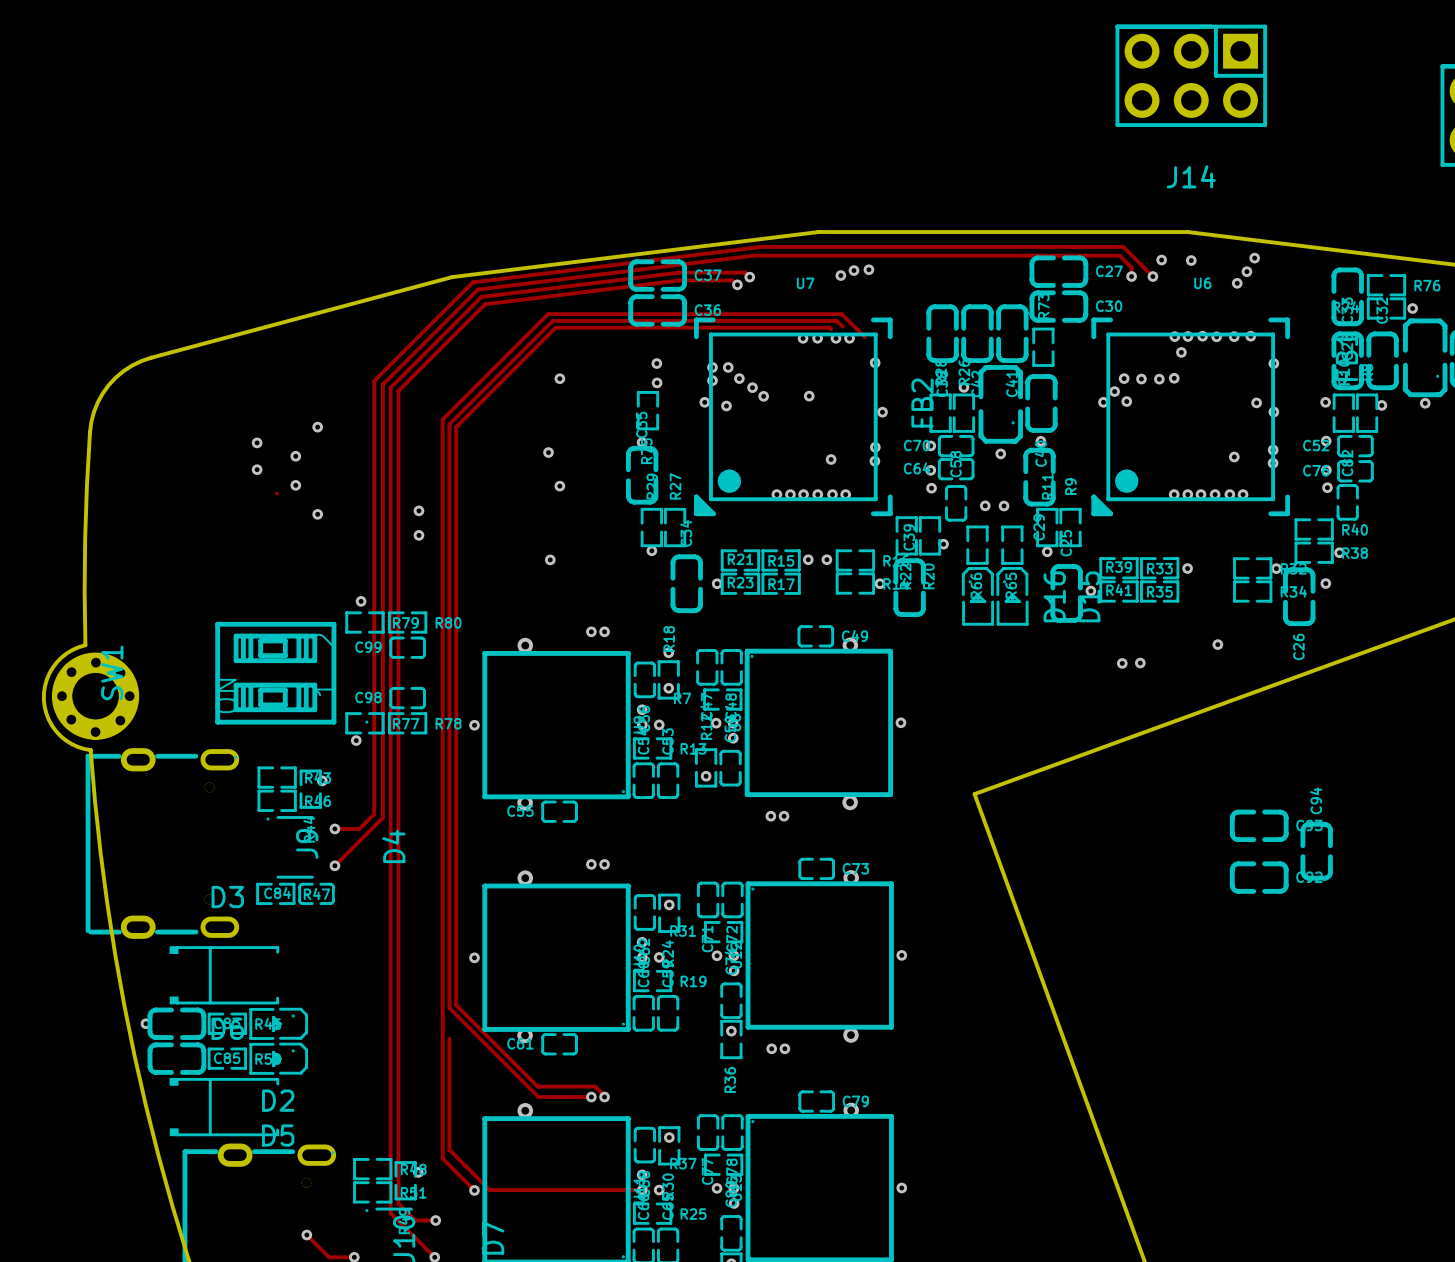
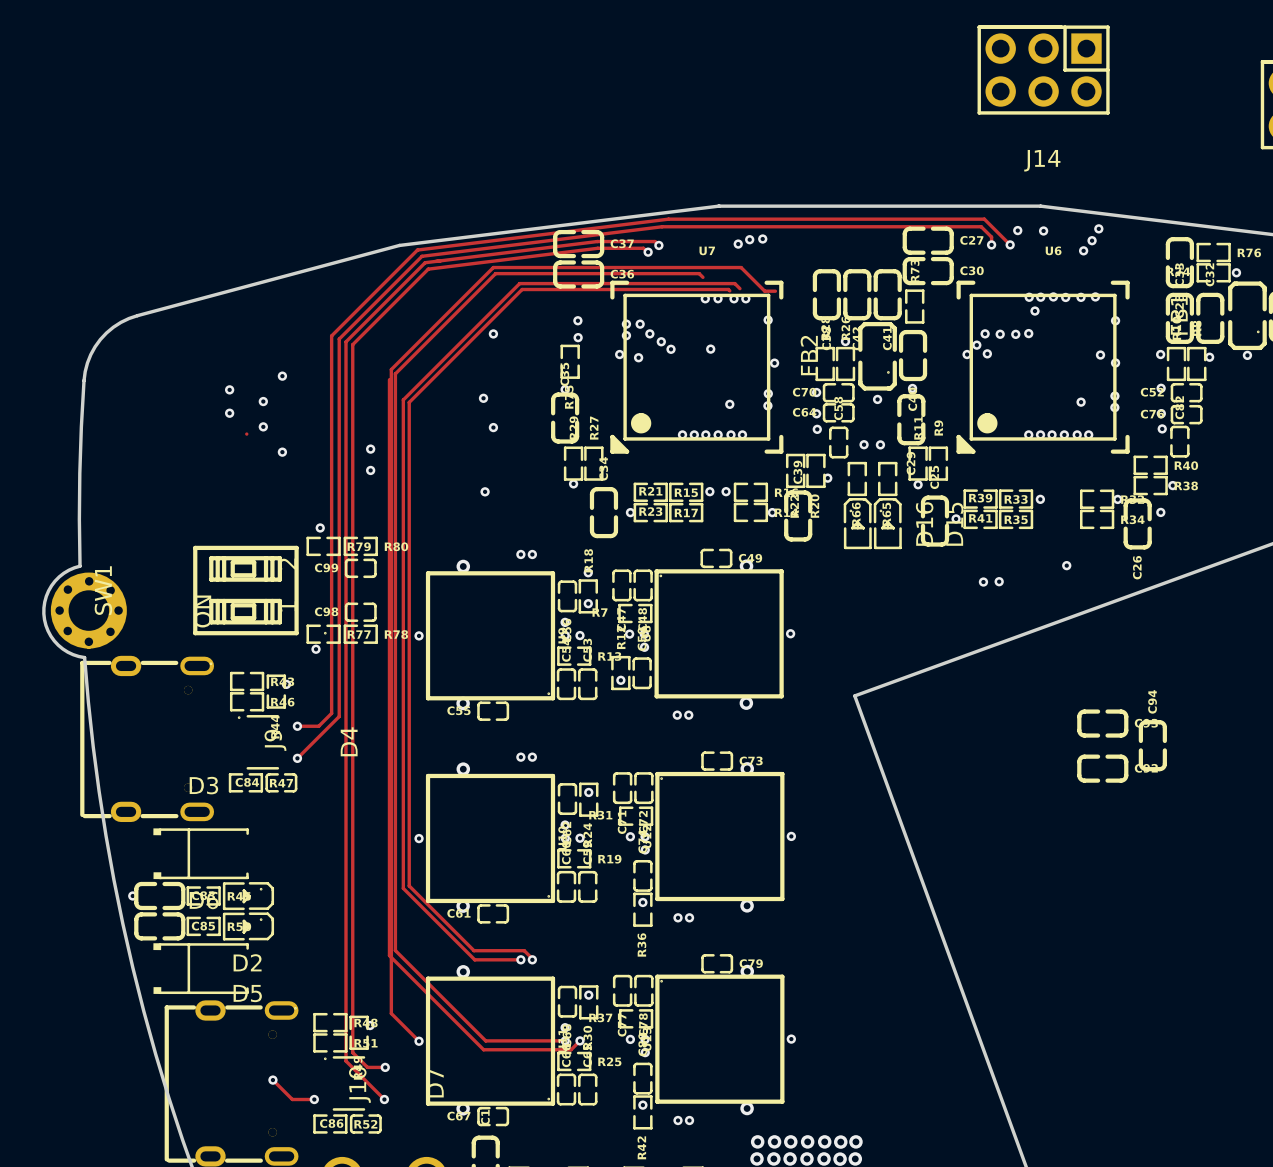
track: (548, 314) (841, 314) (864, 337) -> (483, 277) (493, 267) (741, 267) (764, 291) (775, 291)
track: (590, 320) (552, 320) (449, 424) (449, 1008) (456, 1015) -> (519, 283) (403, 399) (403, 888)
track: (592, 327) (555, 327) (456, 427) (456, 1005) (463, 1012) -> (522, 289) (409, 402) (409, 885)
track: none -> (389, 379) (389, 955) (483, 1049) (571, 1049) (579, 1040)
track: (449, 1038) (449, 1149) (489, 1190) (551, 1190) -> (702, 277) (699, 273) (495, 273) (395, 373) (395, 950) (485, 1040)

